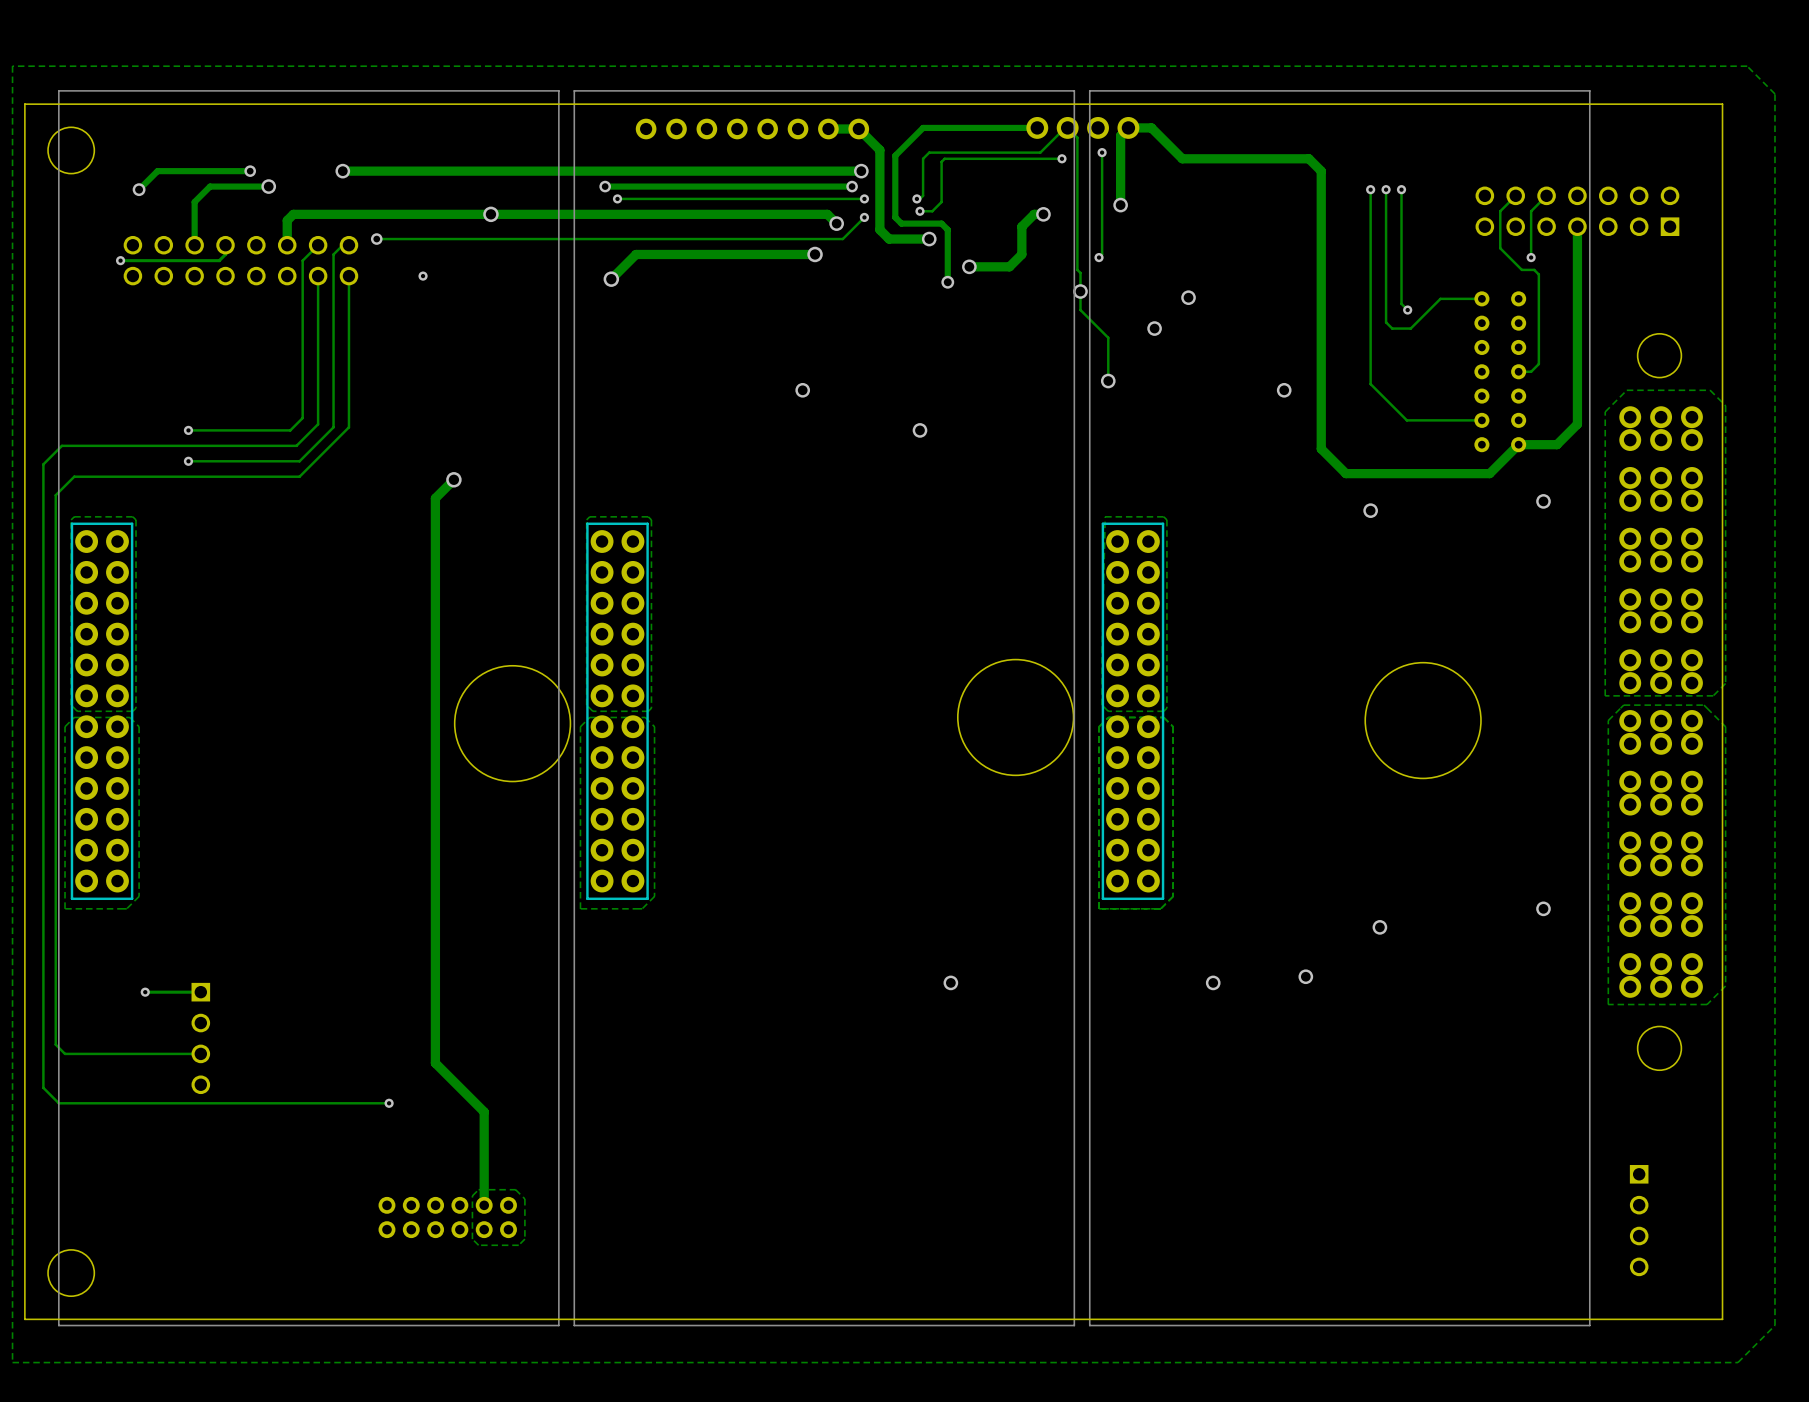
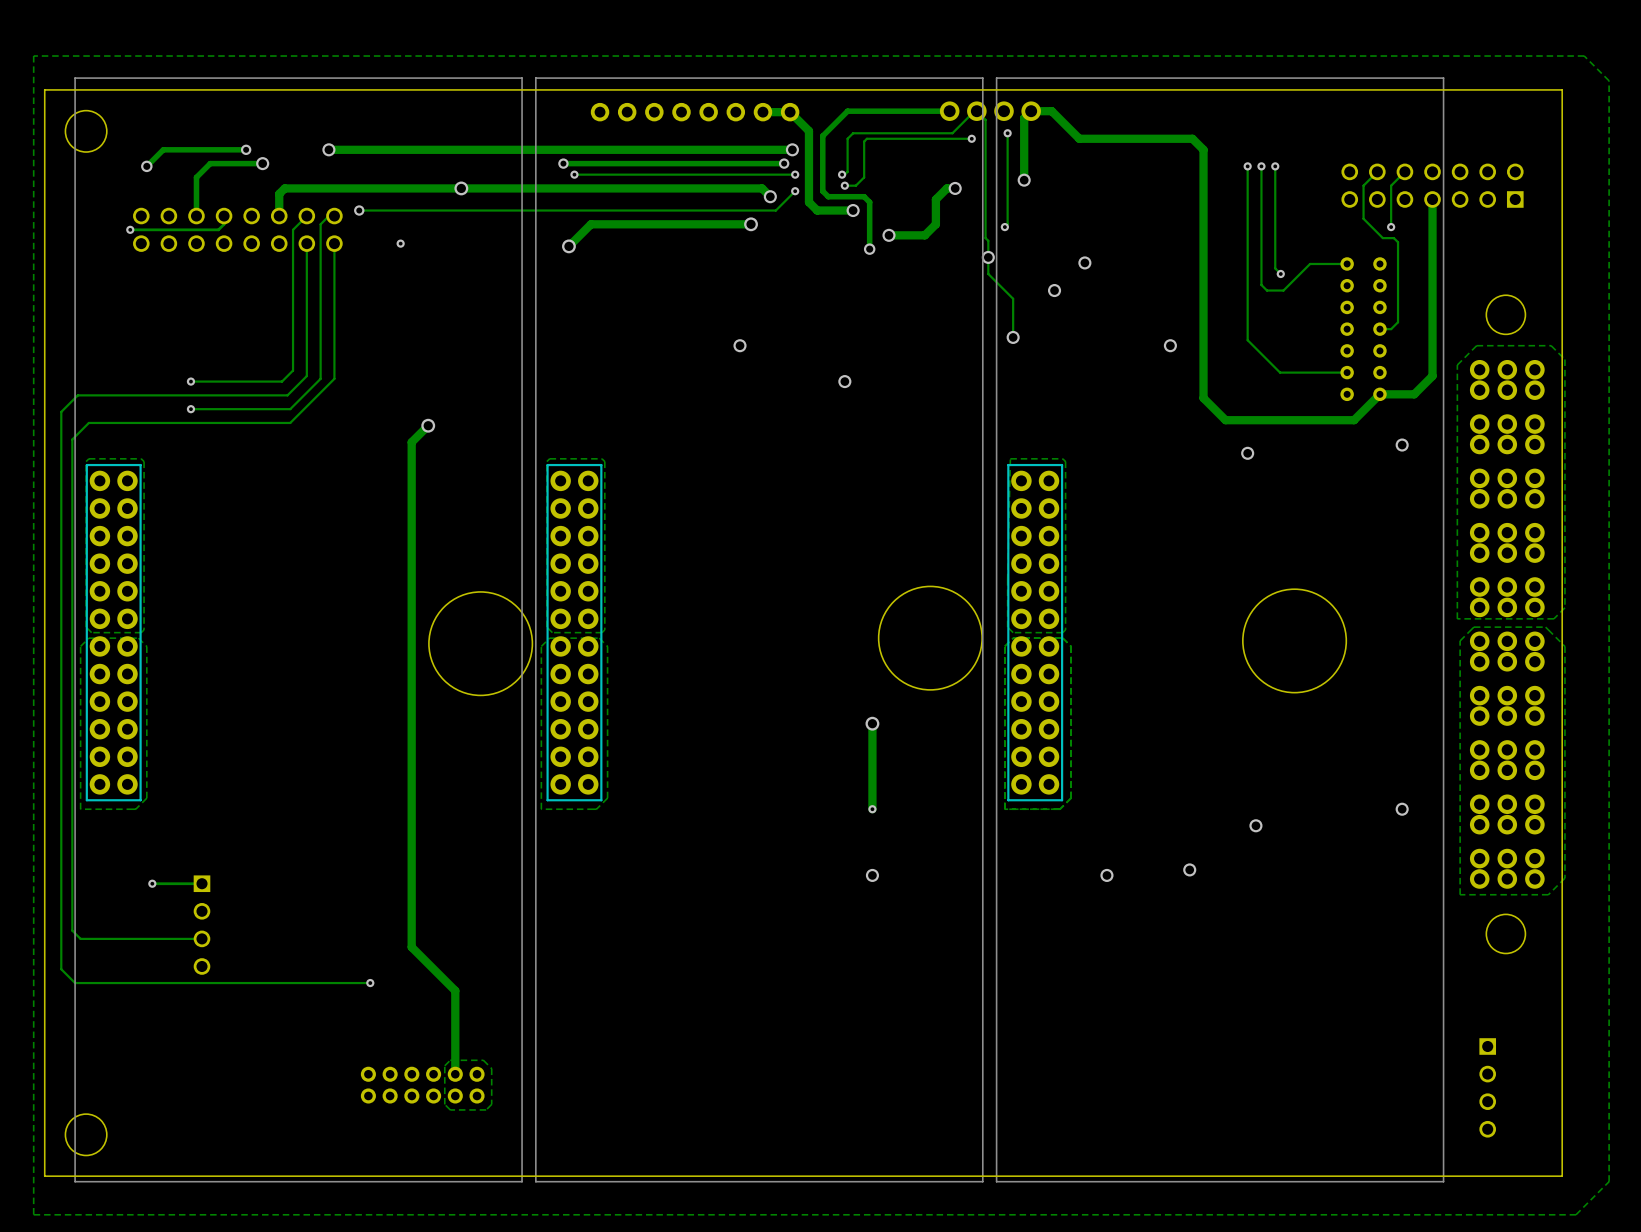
track: none -> (872, 723) (872, 809)
via: none -> (872, 723)
via: none -> (872, 809)

